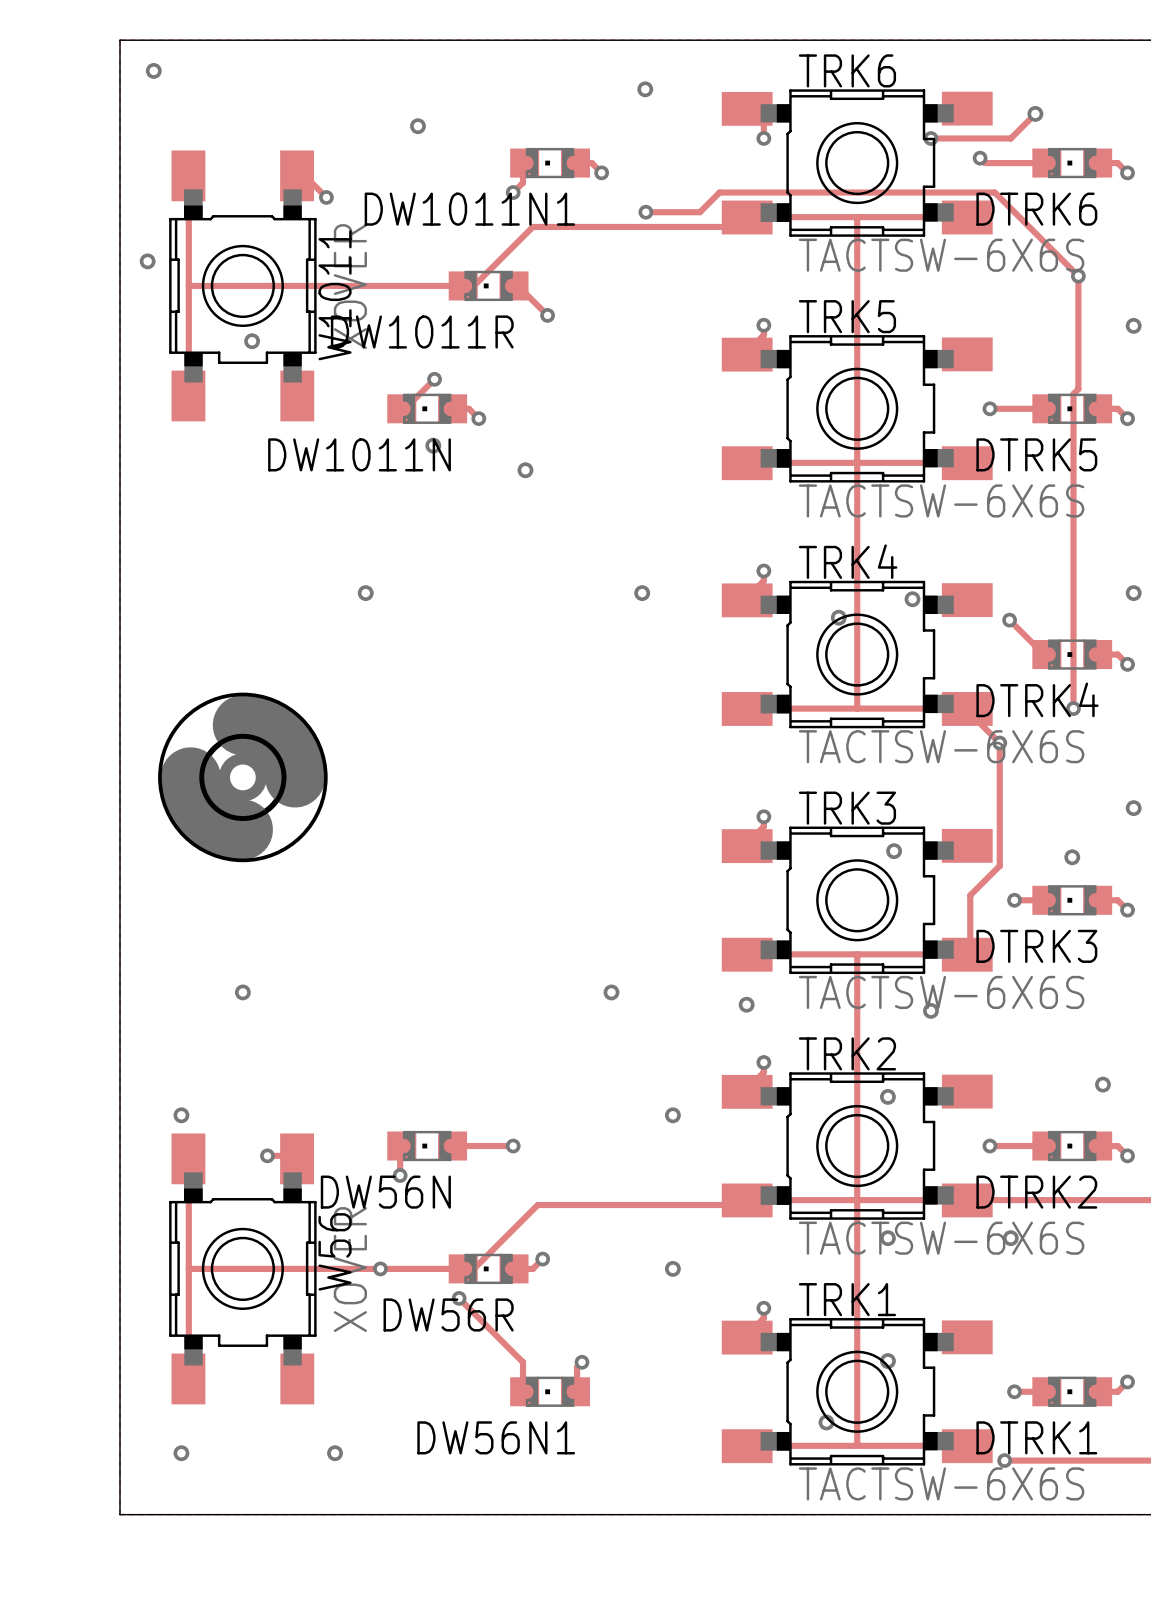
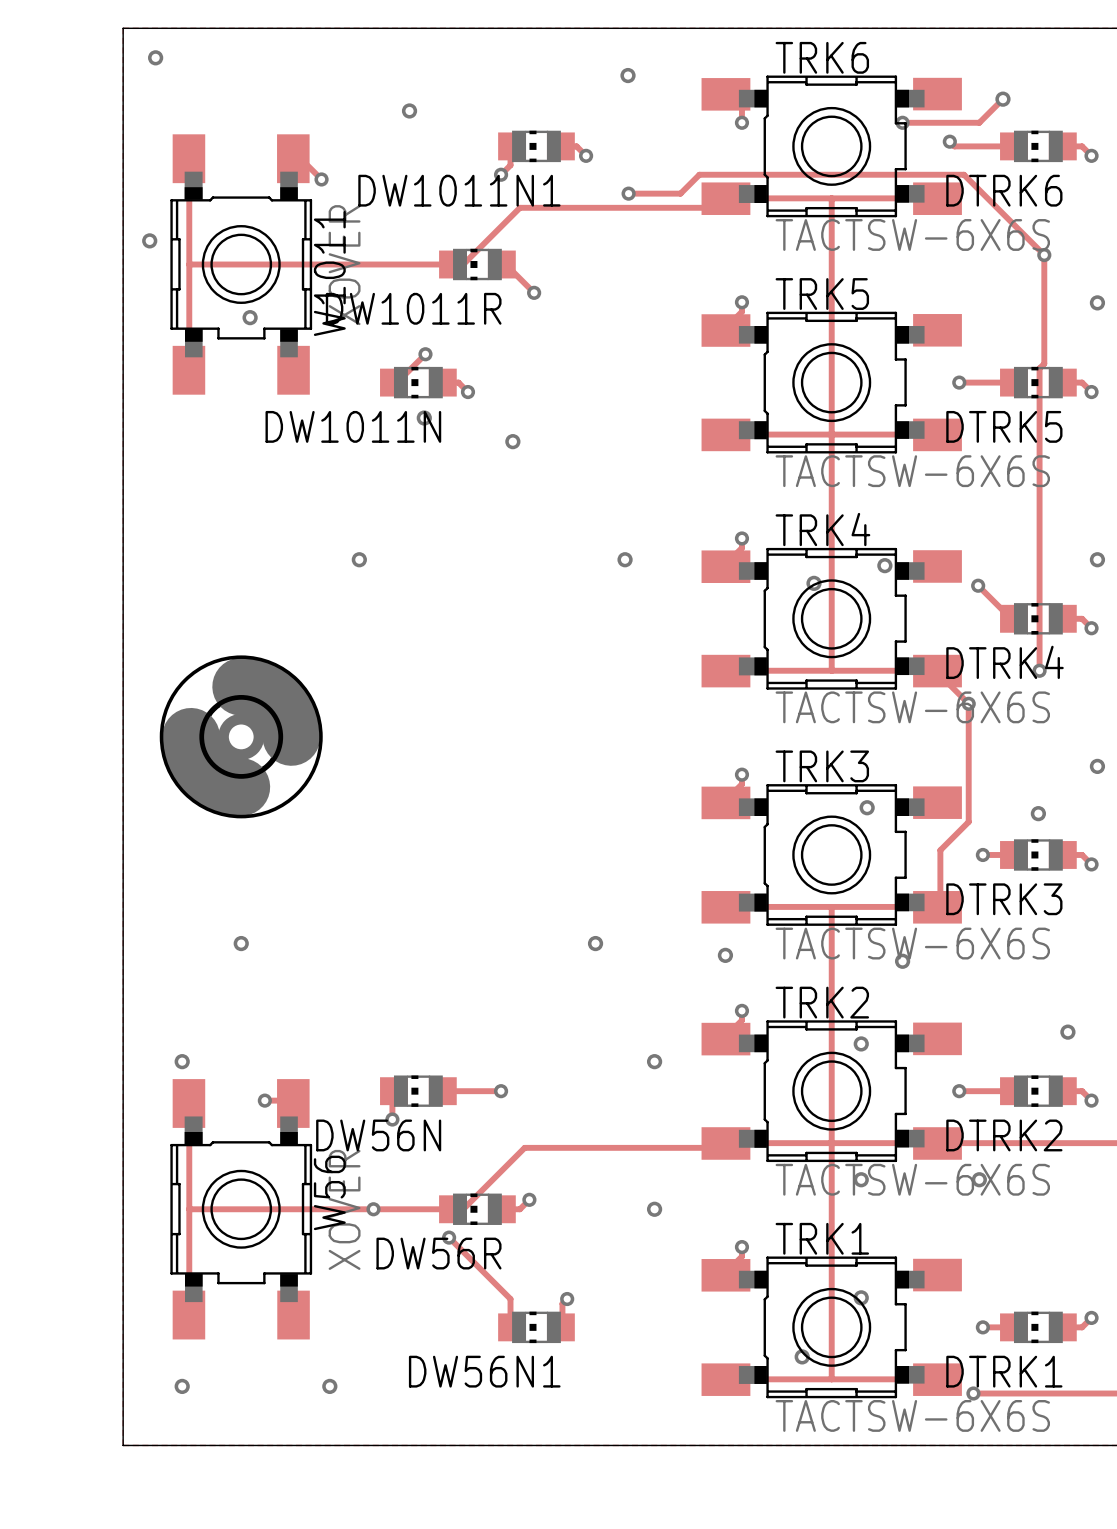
DW1011N1 footprint: [510, 147, 590, 179] -> [498, 130, 575, 163]
DTRK6 footprint: [1032, 147, 1113, 179] -> [1000, 130, 1077, 163]
DW1011R footprint: [448, 270, 529, 302] -> [439, 248, 516, 281]
DW1011N footprint: [387, 393, 468, 424] -> [380, 366, 457, 399]
DTRK5 footprint: [1032, 393, 1113, 424] -> [1000, 366, 1077, 399]
DTRK4 footprint: [1032, 639, 1113, 670] -> [1000, 603, 1077, 635]
DTRK3 footprint: [1032, 885, 1113, 916] -> [1000, 839, 1077, 871]
DW56N footprint: [387, 1130, 468, 1162] -> [380, 1075, 457, 1107]
DTRK2 footprint: [1032, 1130, 1113, 1162] -> [1000, 1075, 1077, 1107]
DW56R footprint: [448, 1253, 529, 1285] -> [439, 1193, 516, 1225]
DW56N1 footprint: [510, 1376, 590, 1407] -> [498, 1311, 575, 1344]
DTRK1 footprint: [1032, 1376, 1113, 1407] -> [1000, 1311, 1077, 1344]

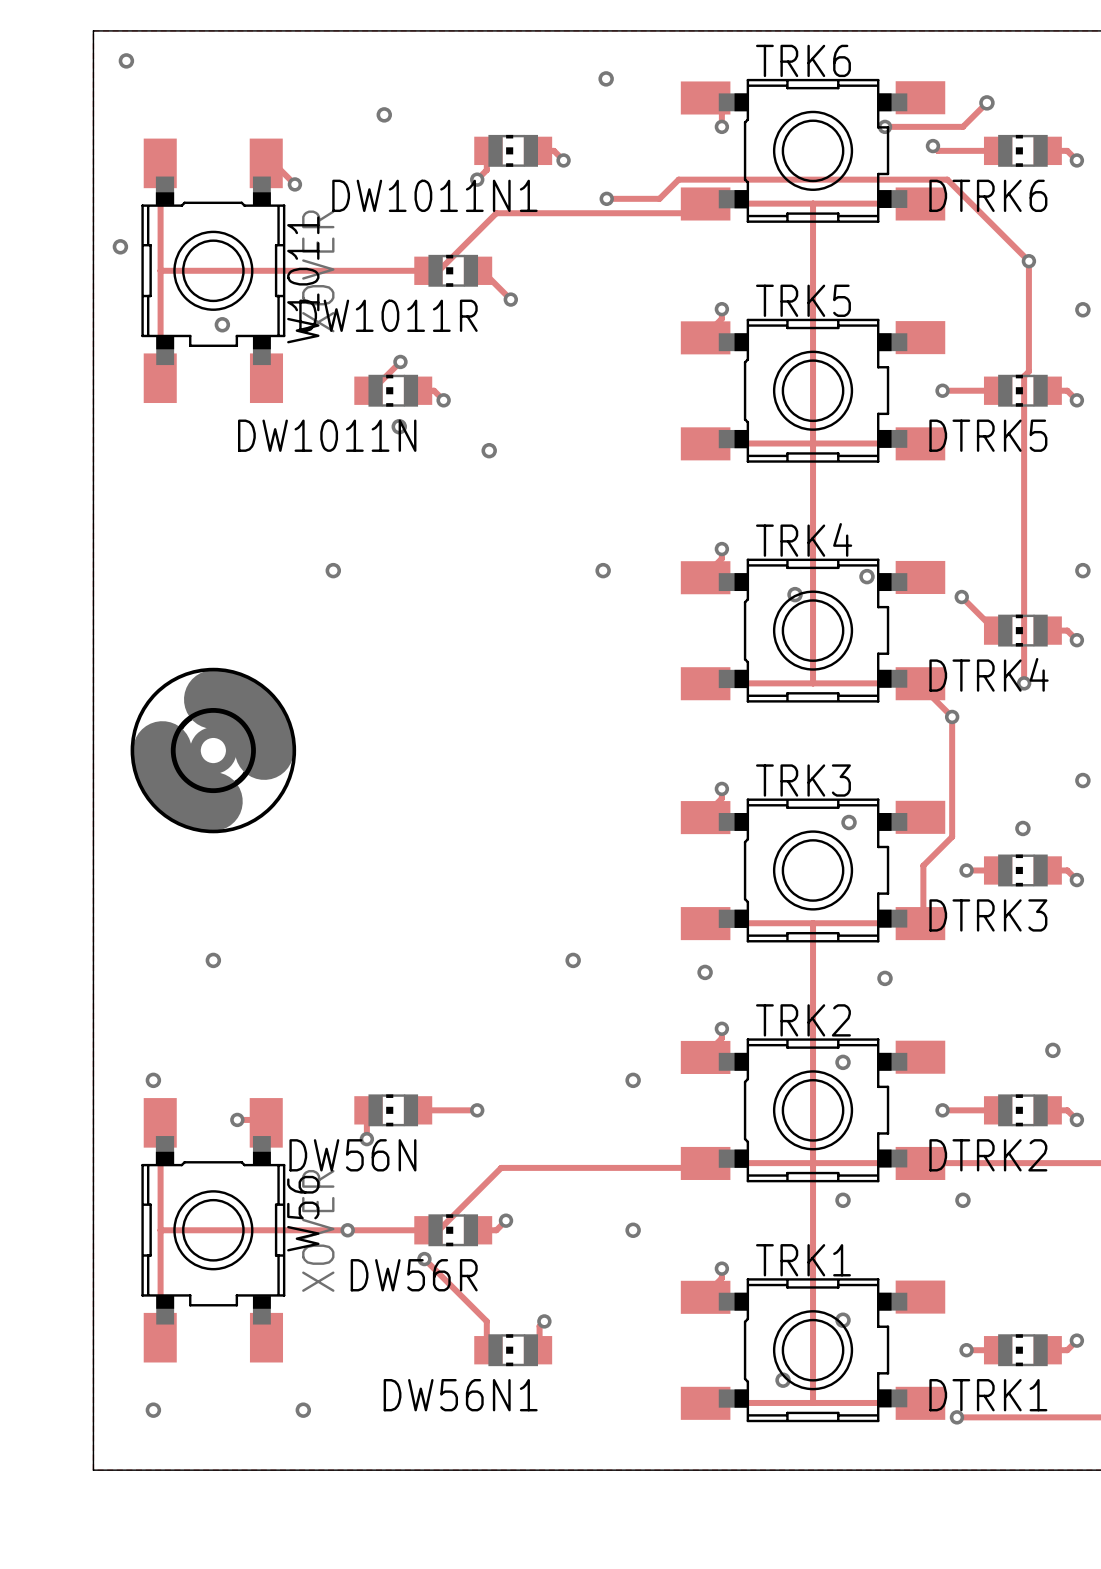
TRK6 value: TACTSW-6X6S (912, 234) -> none
TRK5 value: TACTSW-6X6S (912, 471) -> none
TRK4 value: TACTSW-6X6S (912, 707) -> none
TRK3 value: TACTSW-6X6S (912, 943) -> none
TRK2 value: TACTSW-6X6S (912, 1179) -> none
TRK1 value: TACTSW-6X6S (912, 1415) -> none

